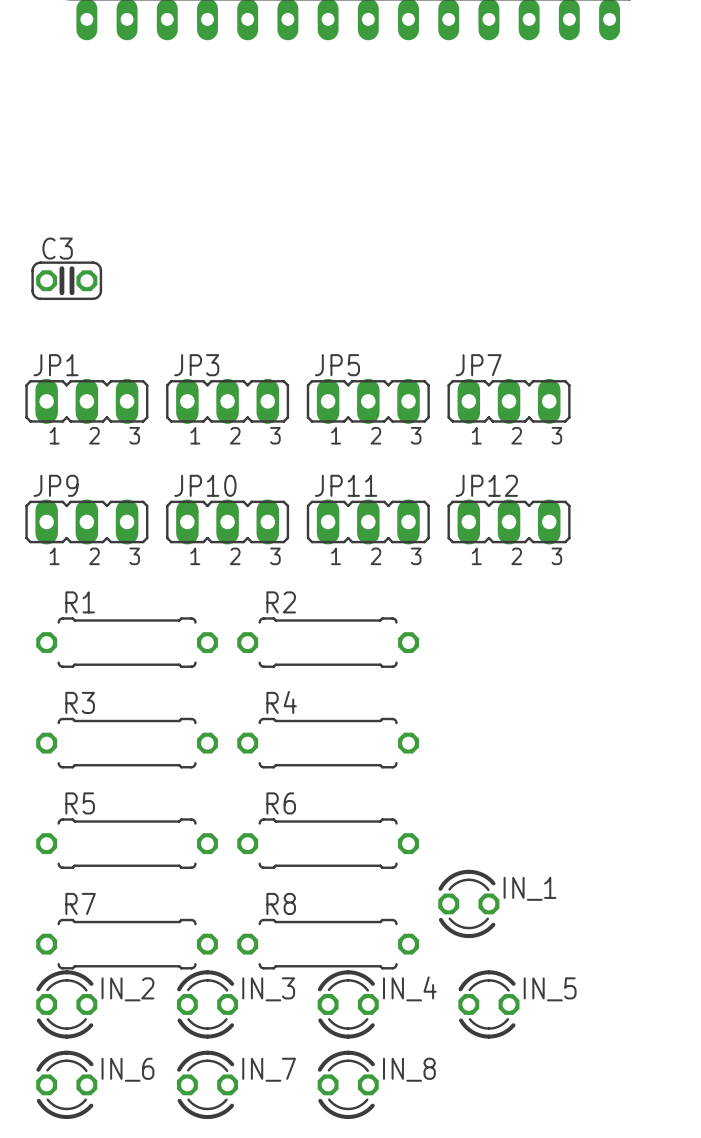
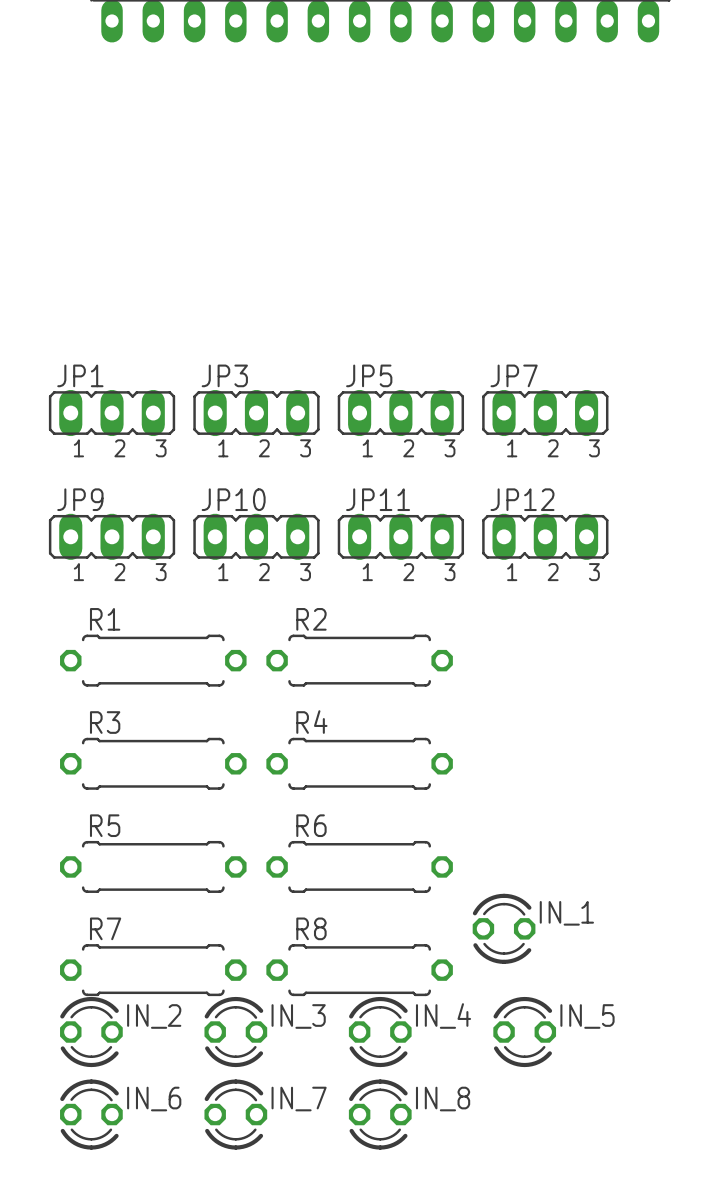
C3: (66, 280) -> none

